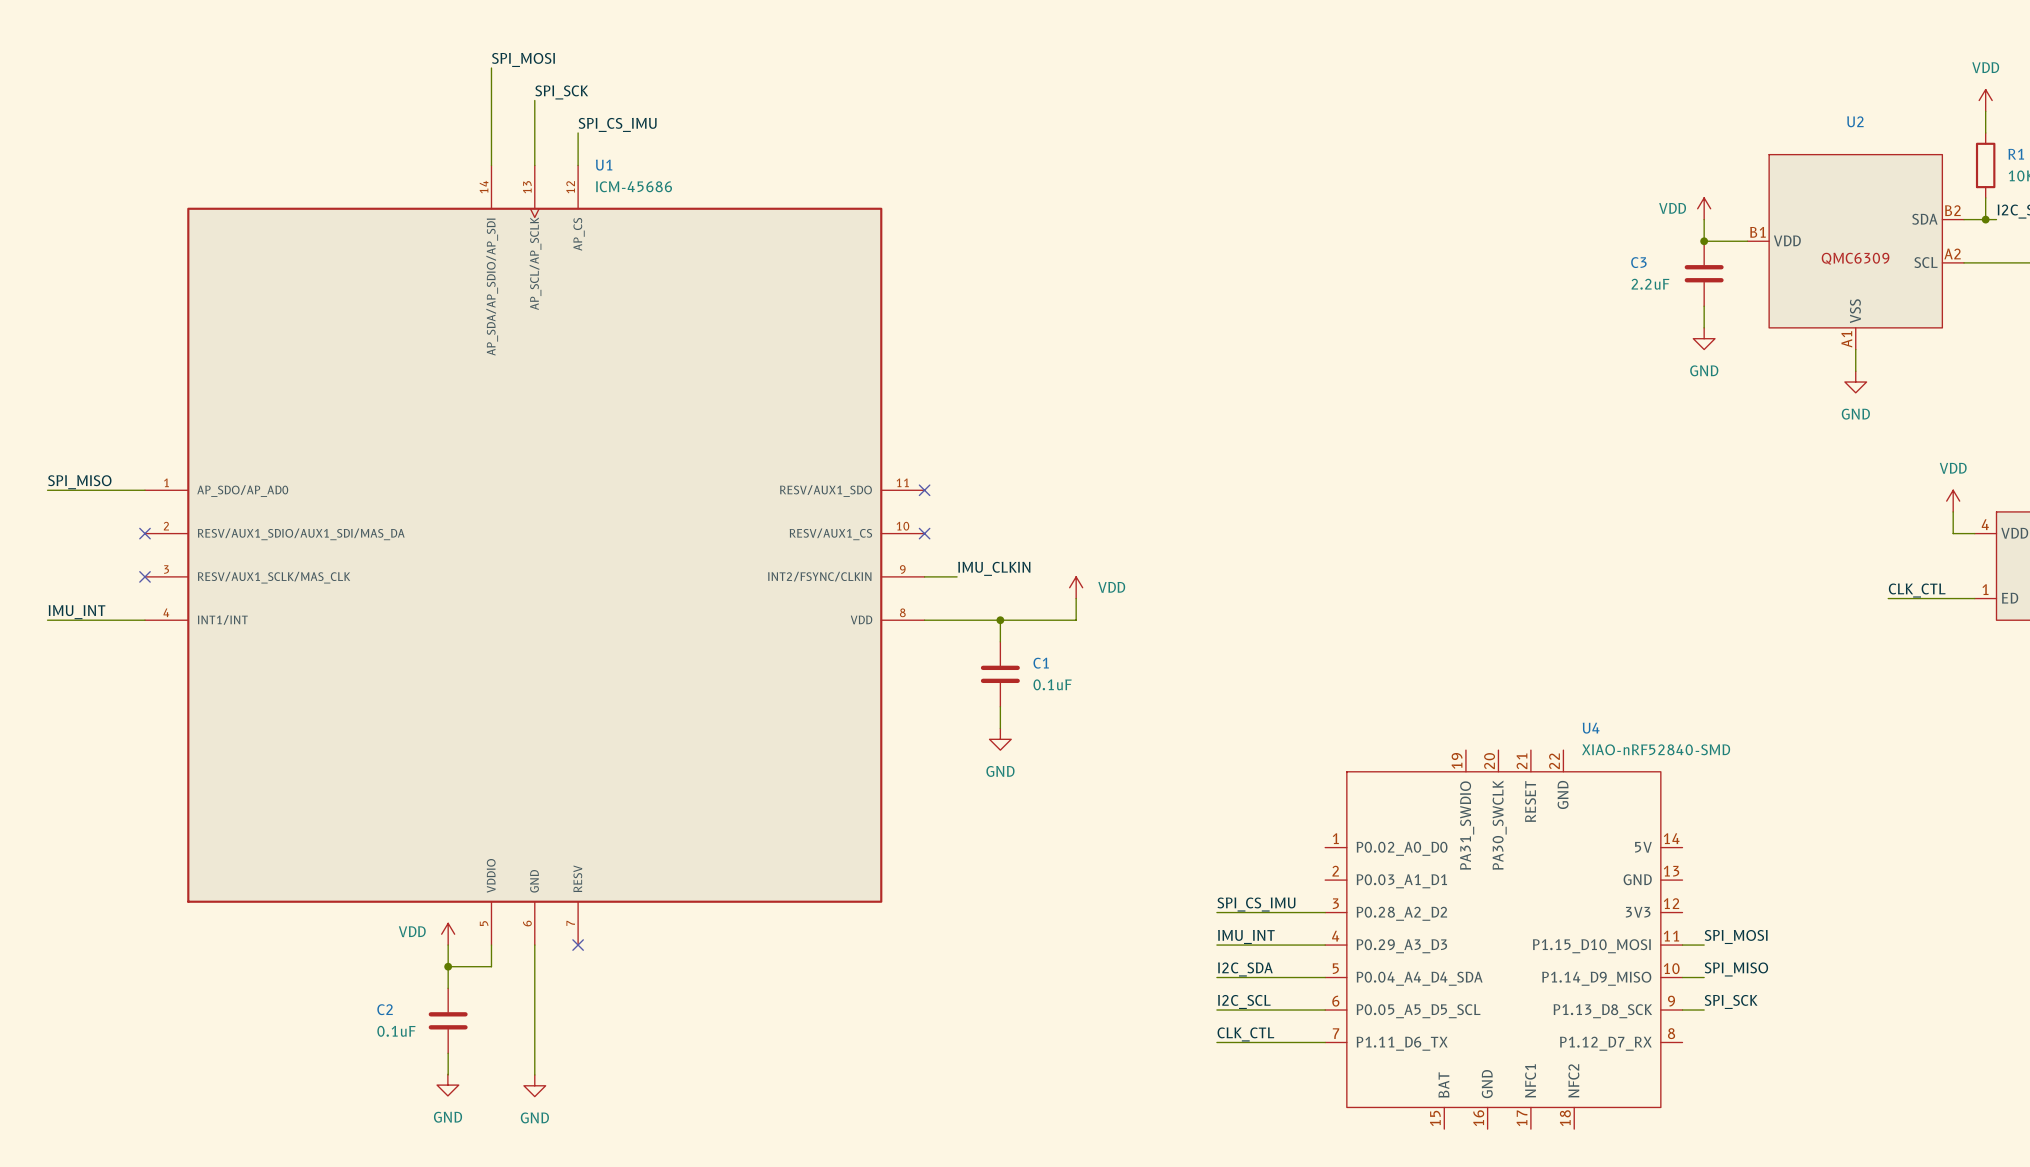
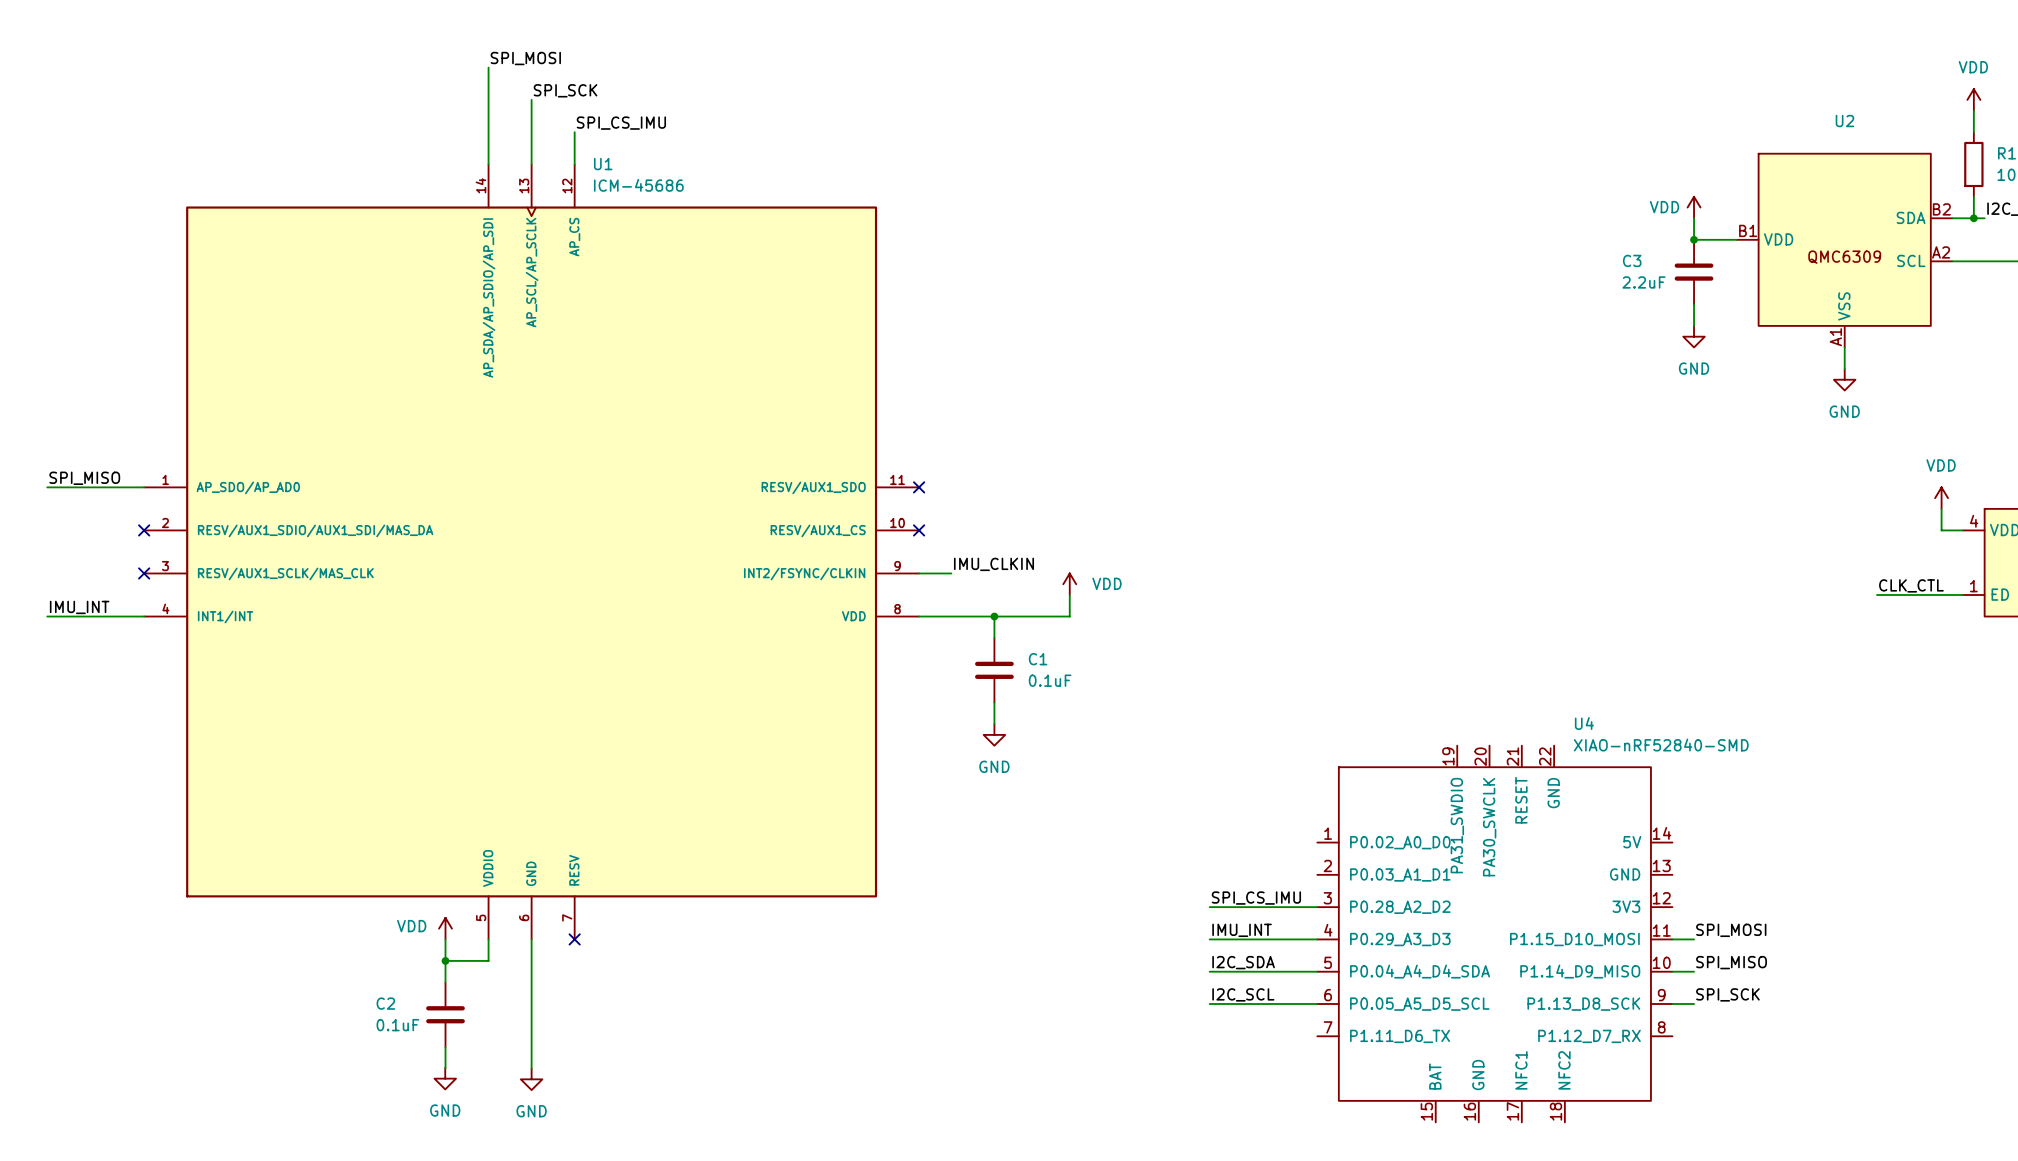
label: CLK_CTL (1245, 1034) -> none
wire: (1216, 1042) (1325, 1042) -> none

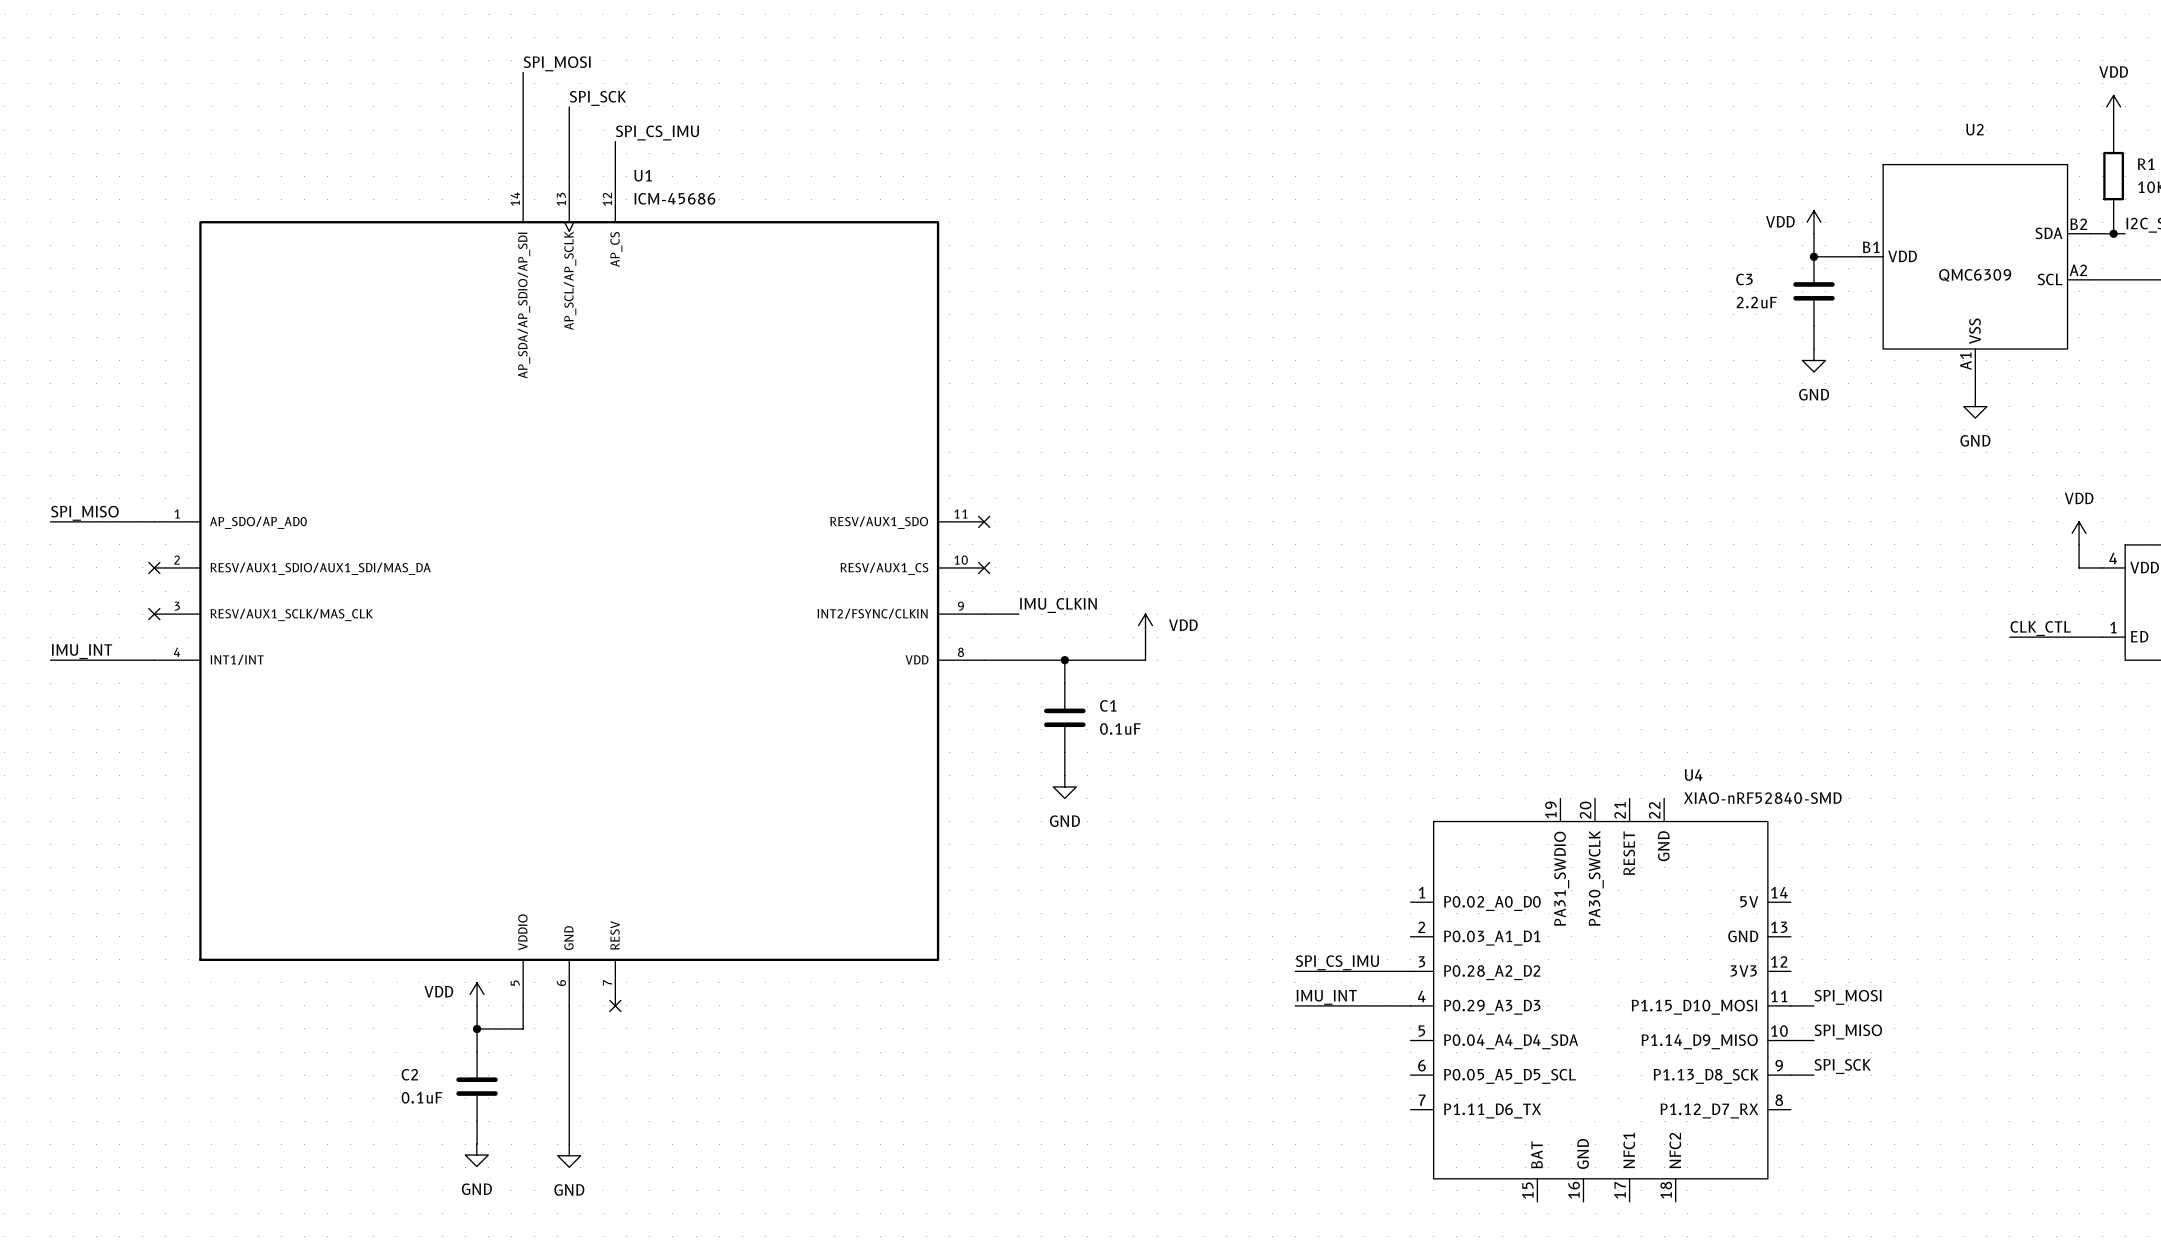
label: I2C_SDA (1243, 962) -> none
wire: (1209, 971) (1317, 971) -> none
label: I2C_SCL (1243, 994) -> none
wire: (1209, 1004) (1317, 1004) -> none

